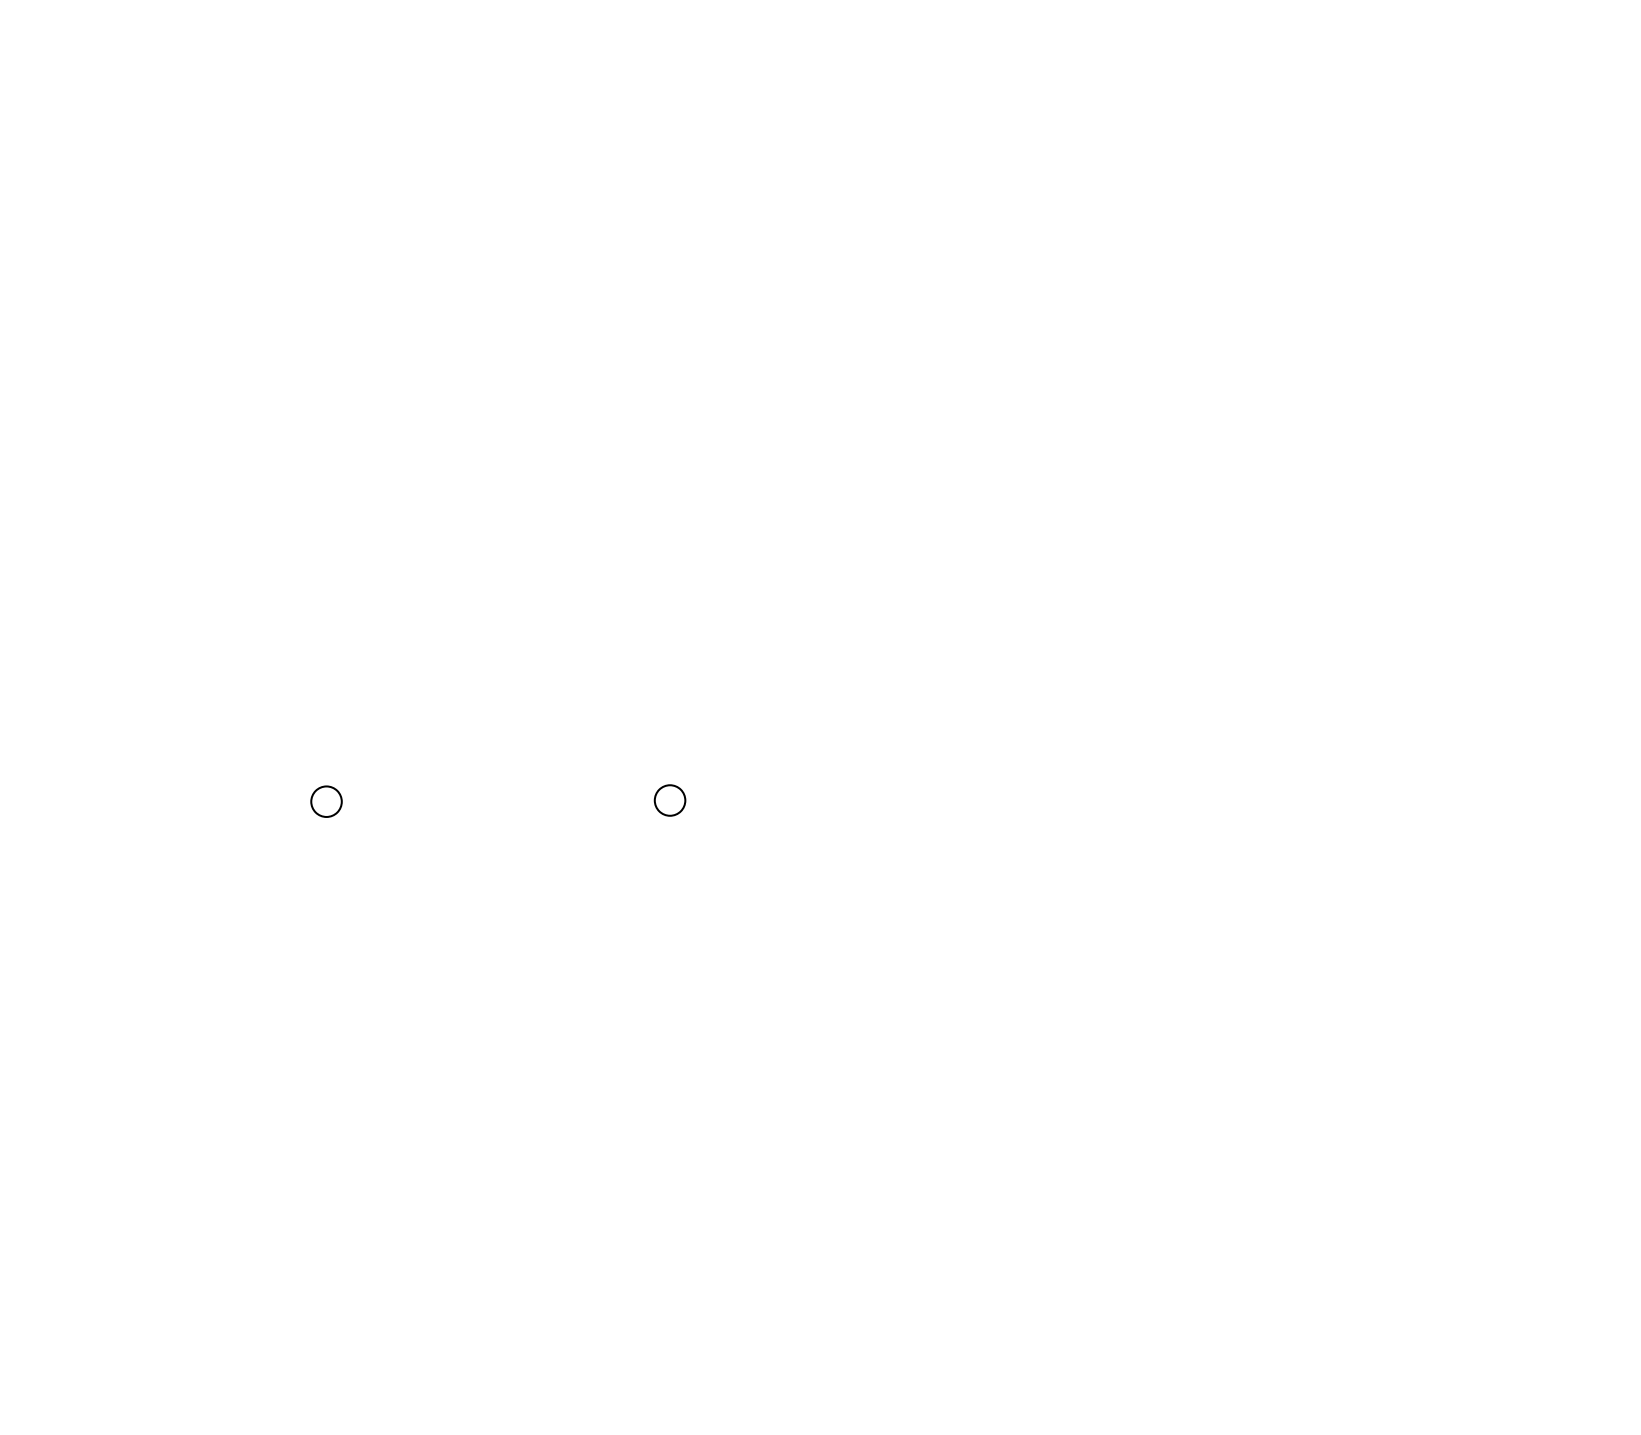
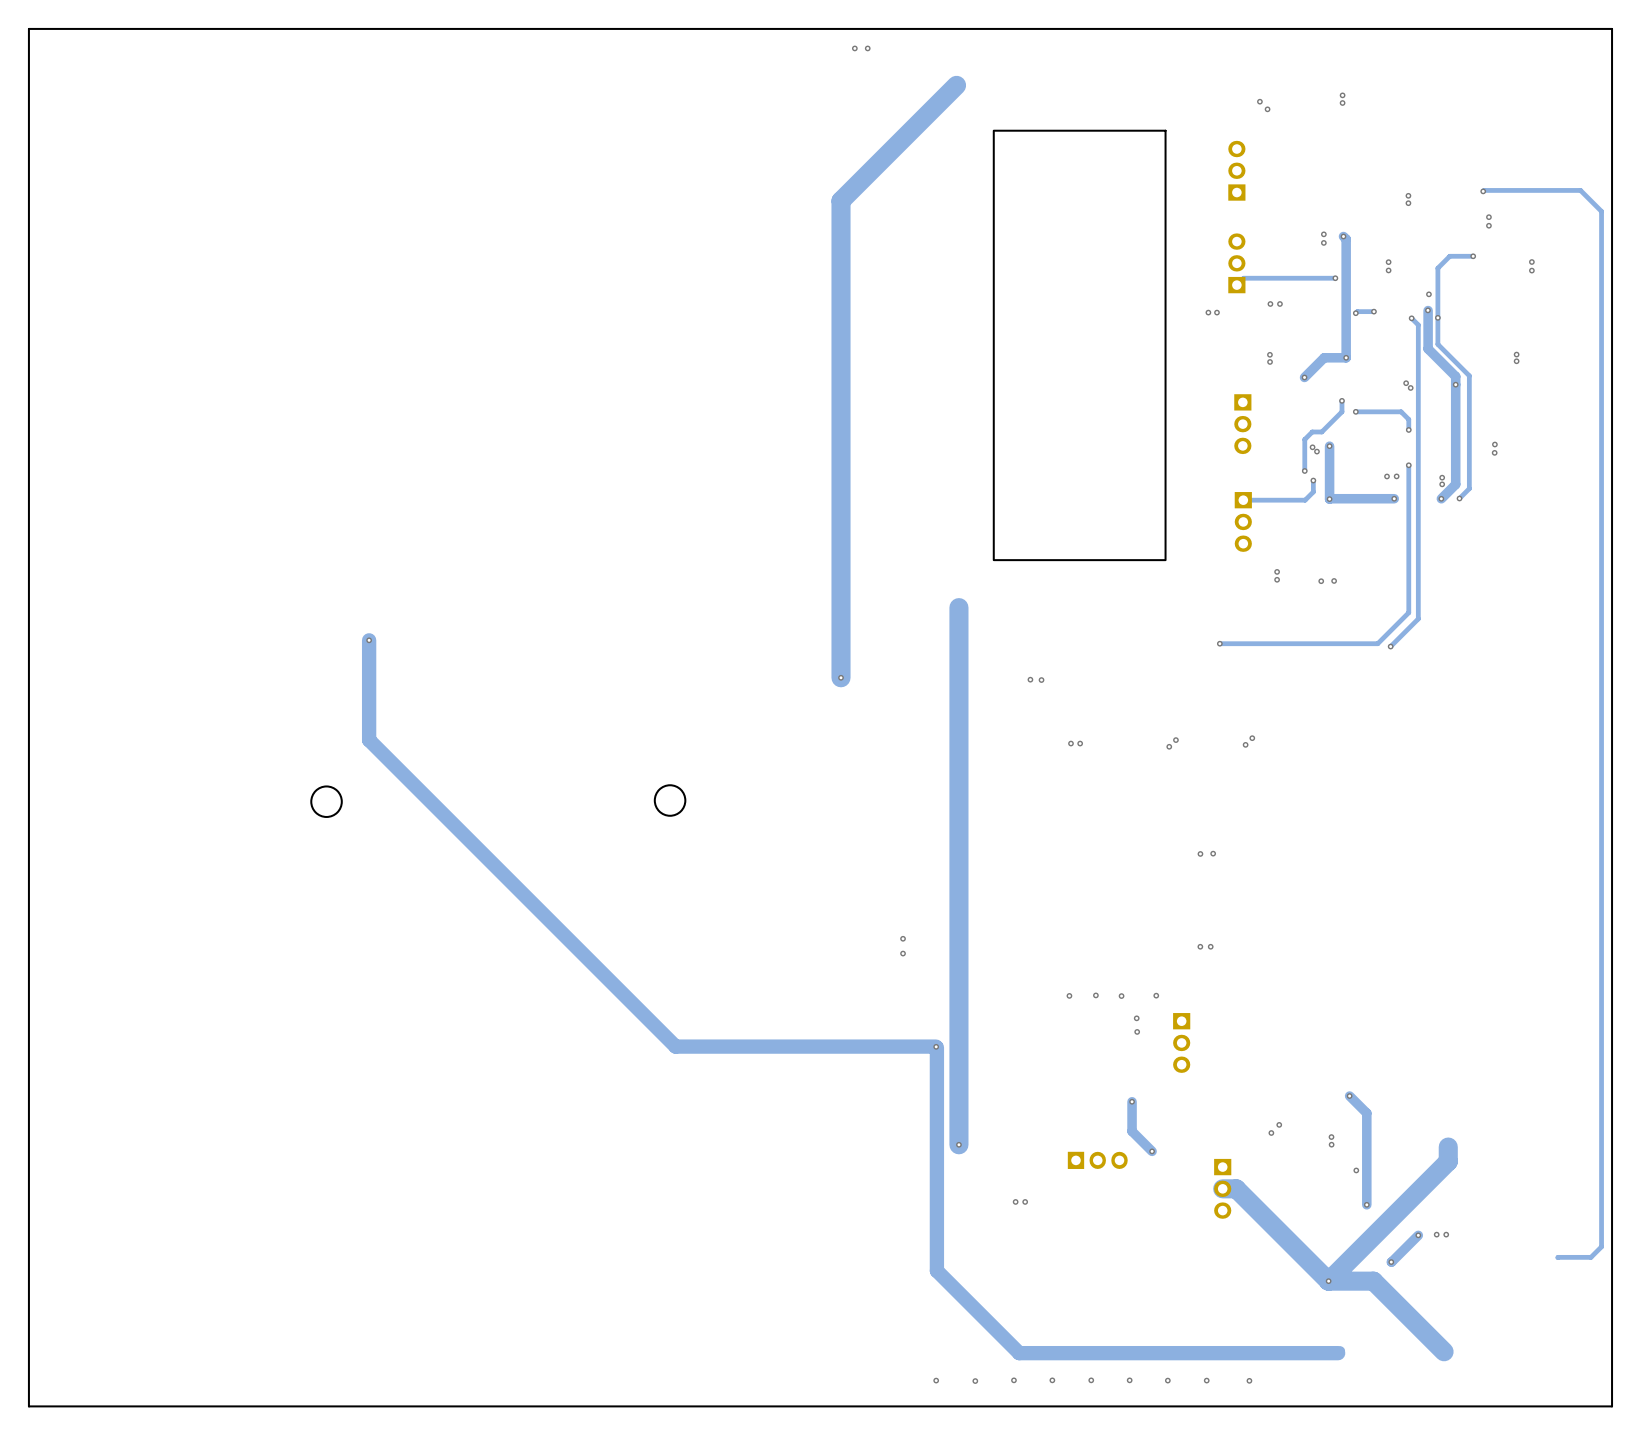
board edge: none -> (1612, 28) (28, 28) (28, 1406) (1612, 1406) (1612, 28)
via: none -> (854, 48)
via: none -> (867, 48)
track: none -> (956, 85) (841, 200) (841, 677)
via: none -> (1342, 95)
via: none -> (1259, 101)
via: none -> (1342, 103)
via: none -> (1267, 109)
drawing: none -> [993, 130, 1167, 561]
part: none -> (1236, 170)
track: none -> (1483, 191) (1580, 190) (1601, 211) (1601, 1246) (1590, 1257) (1557, 1257)
via: none -> (1483, 191)
via: none -> (1408, 195)
via: none -> (1408, 203)
via: none -> (1488, 217)
via: none -> (1488, 225)
via: none -> (1323, 234)
track: none -> (1343, 236) (1346, 239) (1346, 357) (1324, 357) (1304, 377)
via: none -> (1343, 236)
via: none -> (1323, 242)
track: none -> (1473, 256) (1449, 256) (1437, 268) (1437, 344) (1469, 375) (1469, 488) (1459, 498)
via: none -> (1473, 256)
via: none -> (1388, 262)
via: none -> (1531, 262)
part: none -> (1236, 263)
via: none -> (1388, 270)
via: none -> (1531, 270)
track: none -> (1335, 278) (1243, 278) (1236, 285)
via: none -> (1335, 278)
via: none -> (1428, 294)
via: none -> (1270, 304)
via: none -> (1279, 304)
track: none -> (1427, 310) (1428, 348) (1455, 376) (1455, 484) (1441, 498)
via: none -> (1427, 310)
track: none -> (1373, 311) (1355, 313)
via: none -> (1373, 311)
via: none -> (1208, 312)
via: none -> (1216, 312)
via: none -> (1355, 313)
via: none -> (1437, 317)
track: none -> (1411, 318) (1418, 324) (1418, 618) (1390, 646)
via: none -> (1411, 318)
via: none -> (1269, 354)
via: none -> (1516, 354)
via: none -> (1346, 357)
via: none -> (1270, 361)
via: none -> (1516, 361)
via: none -> (1304, 377)
via: none -> (1406, 383)
via: none -> (1455, 384)
via: none -> (1410, 387)
track: none -> (1341, 400) (1341, 411) (1321, 431) (1312, 431) (1304, 439) (1304, 470)
via: none -> (1341, 400)
track: none -> (1355, 411) (1401, 411) (1408, 419) (1408, 429)
via: none -> (1355, 411)
part: none -> (1242, 424)
via: none -> (1408, 429)
via: none -> (1494, 444)
track: none -> (1329, 446) (1329, 499) (1394, 498)
via: none -> (1329, 446)
via: none -> (1312, 447)
via: none -> (1316, 451)
via: none -> (1494, 452)
track: none -> (1408, 465) (1408, 612) (1377, 643) (1219, 643)
via: none -> (1408, 465)
via: none -> (1304, 470)
via: none -> (1387, 476)
via: none -> (1396, 476)
via: none -> (1442, 477)
track: none -> (1313, 480) (1313, 491) (1305, 500) (1243, 500)
via: none -> (1313, 480)
via: none -> (1442, 484)
via: none -> (1394, 498)
via: none -> (1441, 498)
via: none -> (1459, 498)
via: none -> (1329, 499)
part: none -> (1243, 521)
via: none -> (1277, 571)
via: none -> (1277, 579)
via: none -> (1334, 580)
via: none -> (1321, 581)
track: none -> (958, 607) (958, 1144)
track: none -> (369, 640) (369, 740) (675, 1046) (935, 1046)
via: none -> (369, 640)
via: none -> (1219, 643)
via: none -> (1390, 646)
via: none -> (841, 677)
via: none -> (1030, 679)
via: none -> (1041, 680)
via: none -> (1252, 738)
via: none -> (1175, 740)
via: none -> (1070, 743)
via: none -> (1080, 743)
via: none -> (1245, 744)
via: none -> (1169, 746)
via: none -> (1200, 853)
via: none -> (1213, 853)
via: none -> (903, 938)
via: none -> (1200, 946)
via: none -> (1210, 946)
via: none -> (903, 953)
via: none -> (1069, 995)
via: none -> (1095, 995)
via: none -> (1156, 995)
via: none -> (1121, 996)
via: none -> (1136, 1018)
via: none -> (1137, 1031)
part: none -> (1181, 1042)
via: none -> (936, 1046)
track: none -> (936, 1047) (936, 1270) (1019, 1353) (1338, 1353) (1340, 1351)
track: none -> (1349, 1096) (1366, 1113) (1366, 1204)
via: none -> (1349, 1096)
track: none -> (1132, 1101) (1132, 1131) (1152, 1151)
via: none -> (1132, 1101)
via: none -> (1279, 1124)
via: none -> (1271, 1133)
via: none -> (1331, 1137)
via: none -> (958, 1144)
via: none -> (1331, 1144)
track: none -> (1448, 1147) (1448, 1161) (1328, 1281)
via: none -> (1152, 1151)
part: none -> (1097, 1160)
via: none -> (1356, 1170)
track: none -> (1222, 1188) (1236, 1188) (1328, 1281)
part: none -> (1222, 1188)
via: none -> (1015, 1201)
via: none -> (1025, 1201)
via: none -> (1366, 1204)
via: none -> (1436, 1234)
via: none -> (1446, 1234)
track: none -> (1418, 1235) (1391, 1262)
via: none -> (1418, 1235)
via: none -> (1391, 1262)
track: none -> (1328, 1281) (1373, 1281) (1444, 1351)
via: none -> (1328, 1281)
via: none -> (936, 1380)
via: none -> (1013, 1380)
via: none -> (1052, 1380)
via: none -> (1091, 1380)
via: none -> (1129, 1380)
via: none -> (1167, 1380)
via: none -> (1206, 1380)
via: none -> (1249, 1380)
via: none -> (975, 1381)

